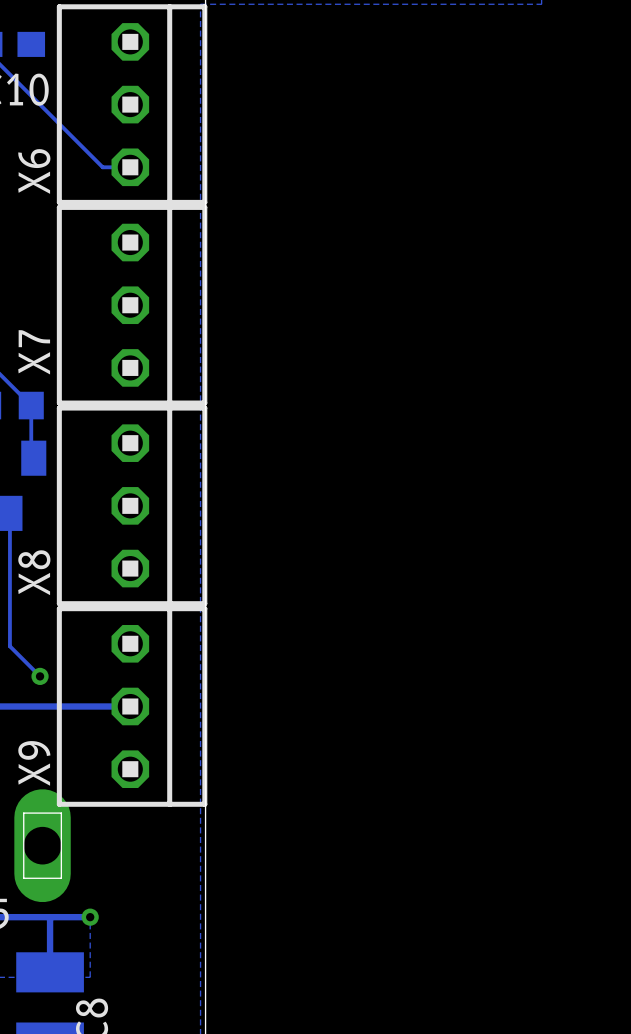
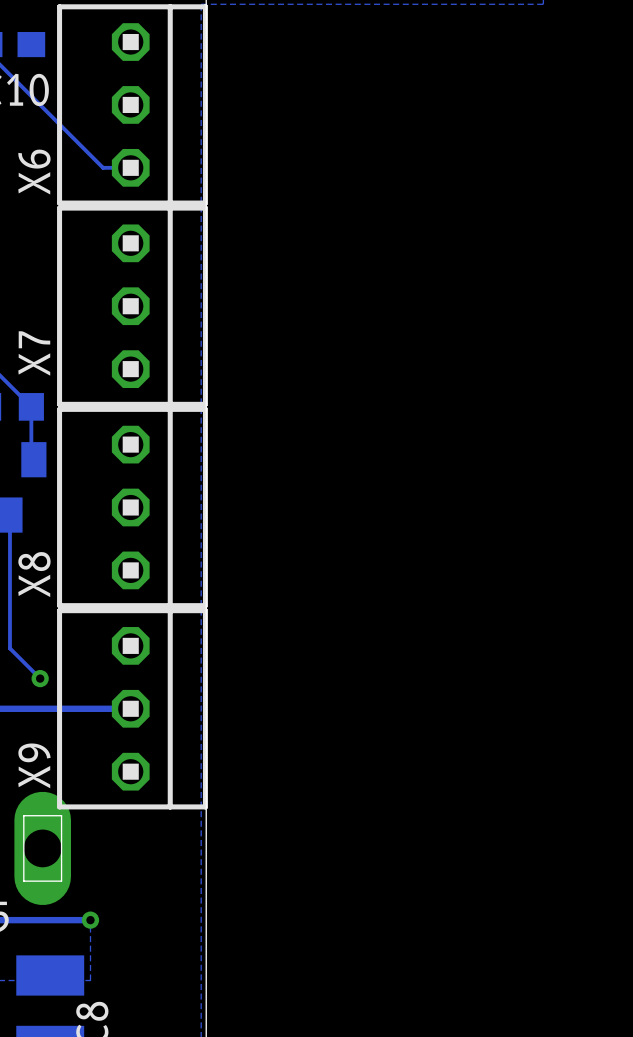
track: (50, 917) (50, 972) -> none

